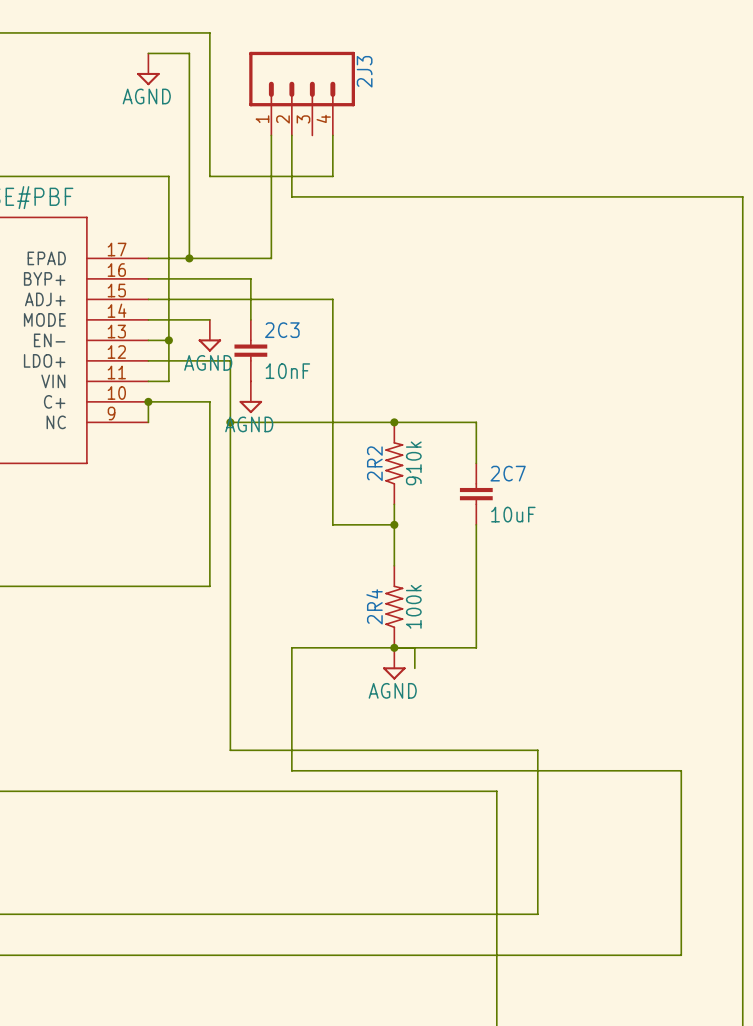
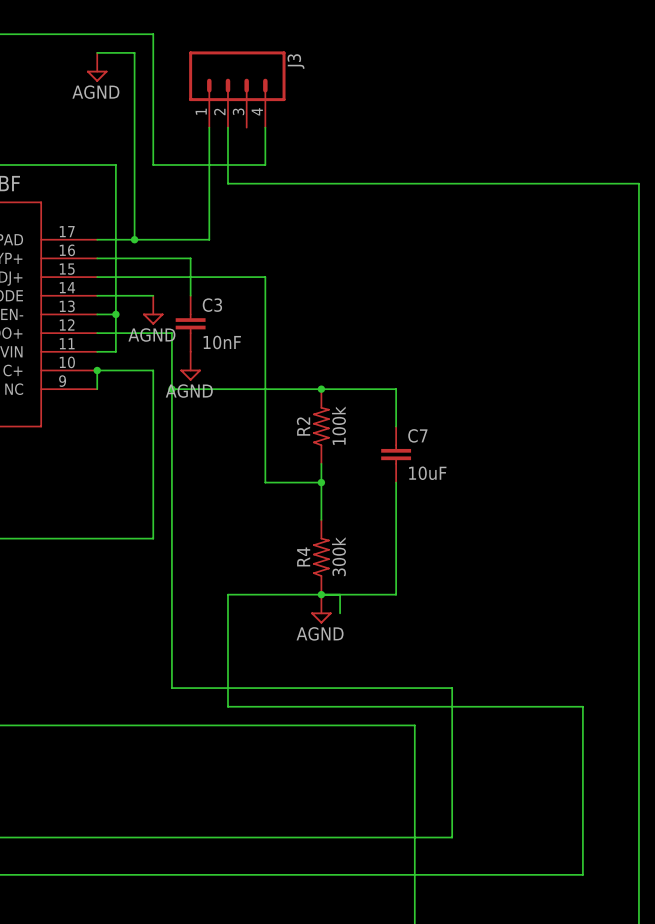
2J3 name: 2J3 (364, 71) -> J3 (295, 61)
2C3 name: 2C3 (282, 330) -> C3 (212, 305)
2R2 name: 2R2 (374, 463) -> R2 (303, 426)
2R2 value: 910k (413, 463) -> 100k (338, 425)
2C7 name: 2C7 (508, 473) -> C7 (417, 435)
2R4 name: 2R4 (374, 606) -> R4 (303, 556)
2R4 value: 100k (413, 606) -> 300k (338, 556)

